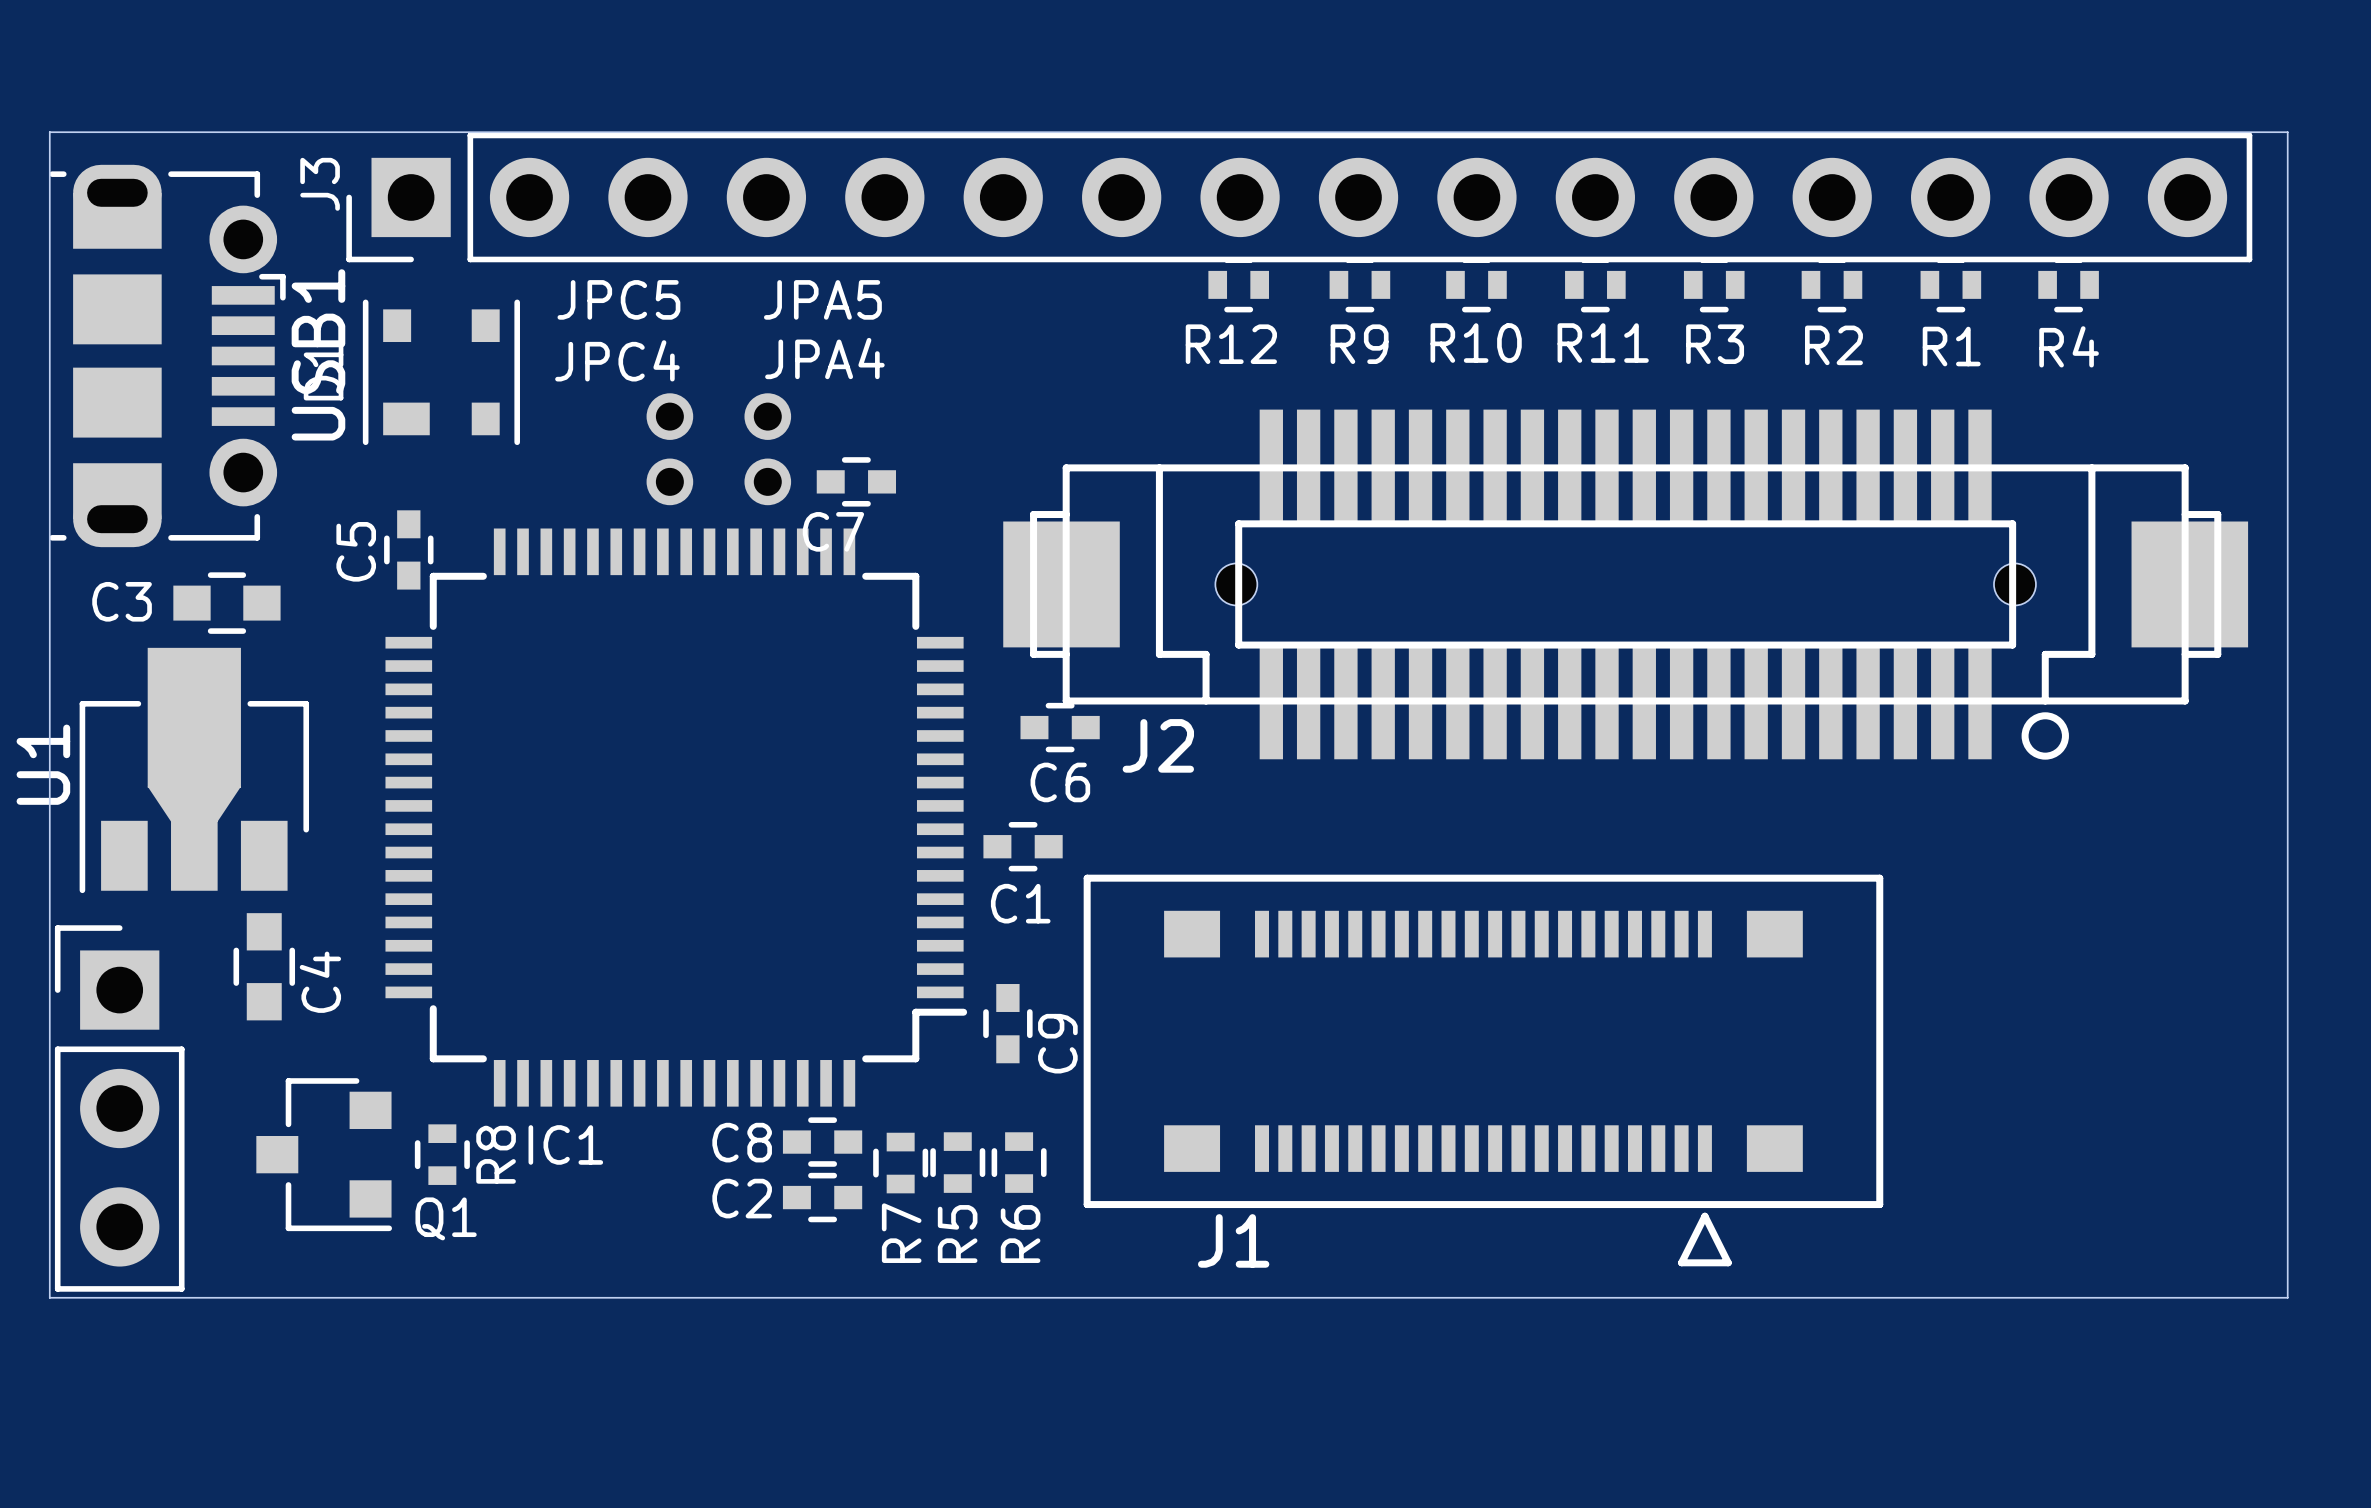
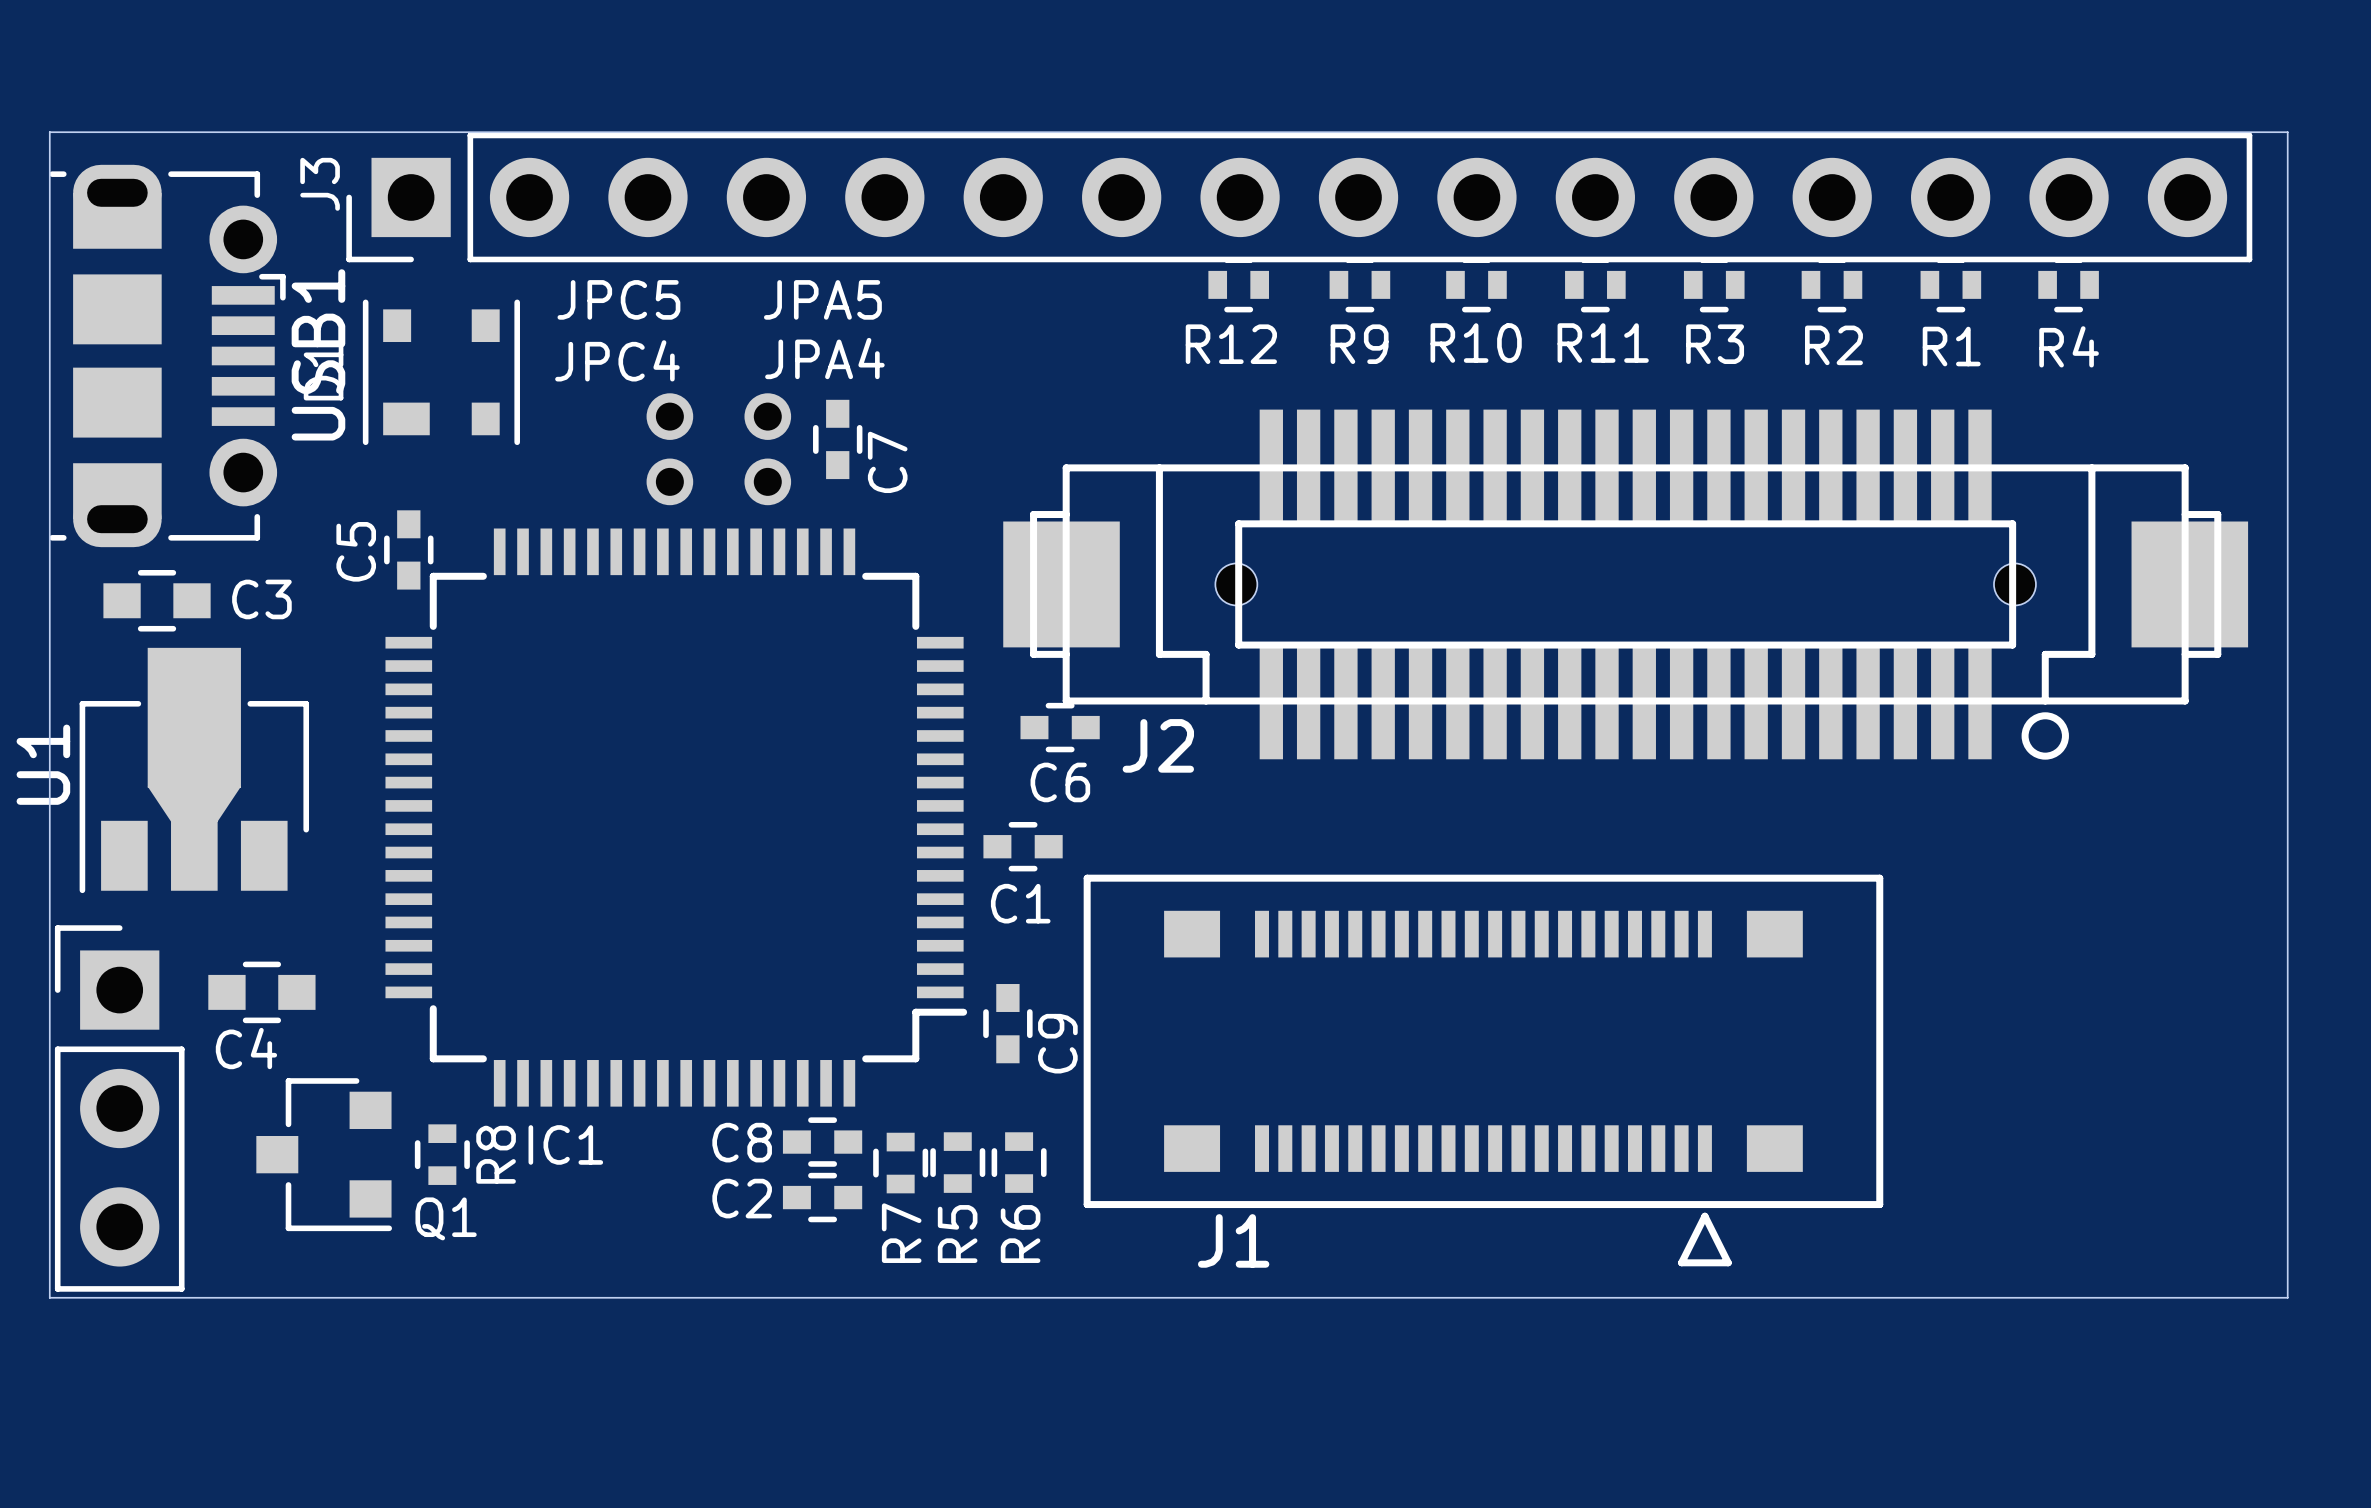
C7 rotation: 0° (856, 481) -> 90° clockwise (837, 439)
C3 name position: C3 (122, 601) -> C3 (261, 599)
C3 position: (226, 603) -> (157, 600)
C4 rotation: 0° (264, 966) -> 90° clockwise (261, 992)

